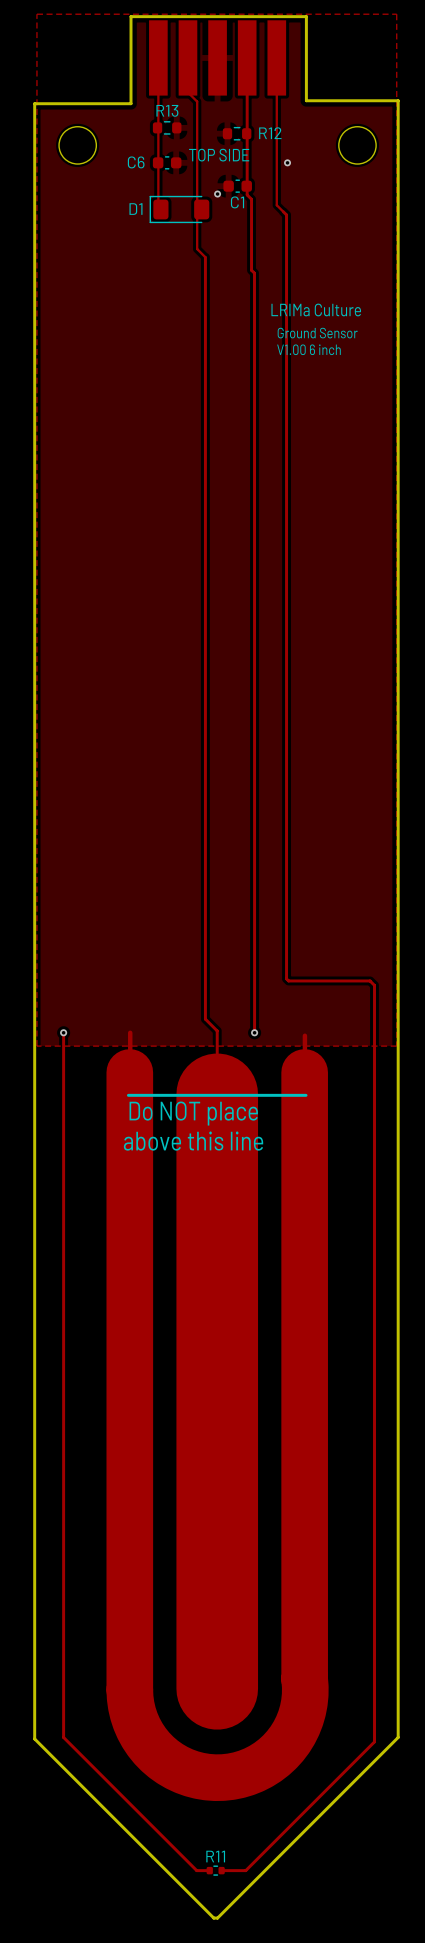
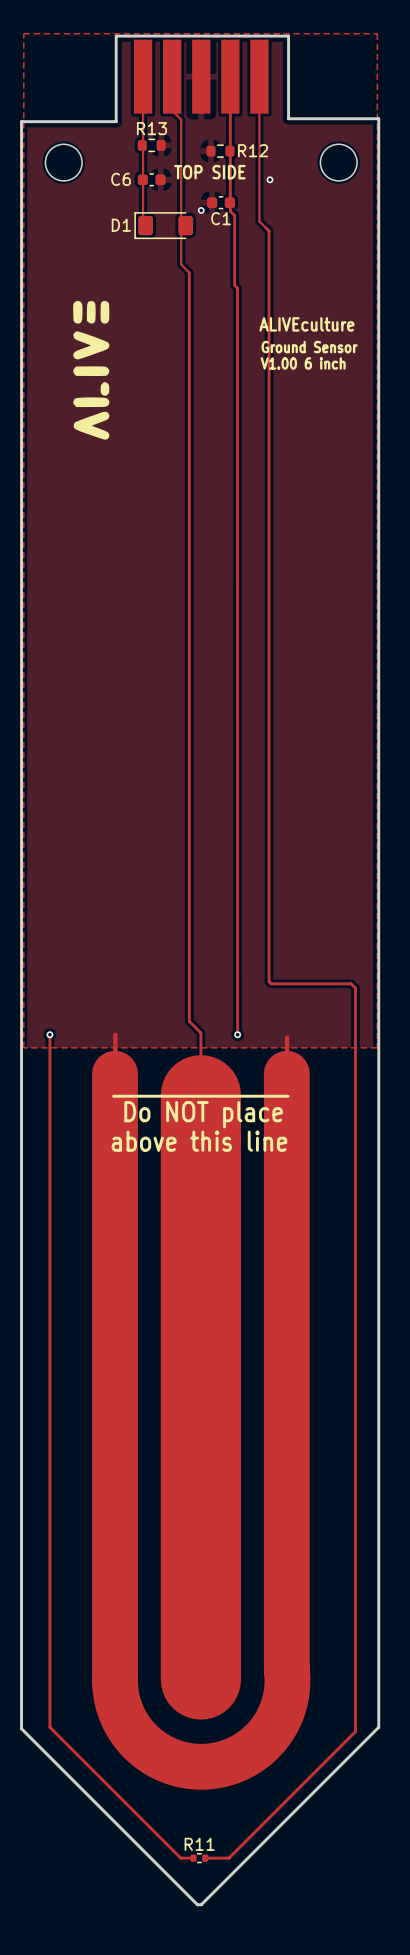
drawing: none -> [73, 300, 110, 440]
text: LRIMa Culture (316, 309) -> ALIVEculture (306, 324)

